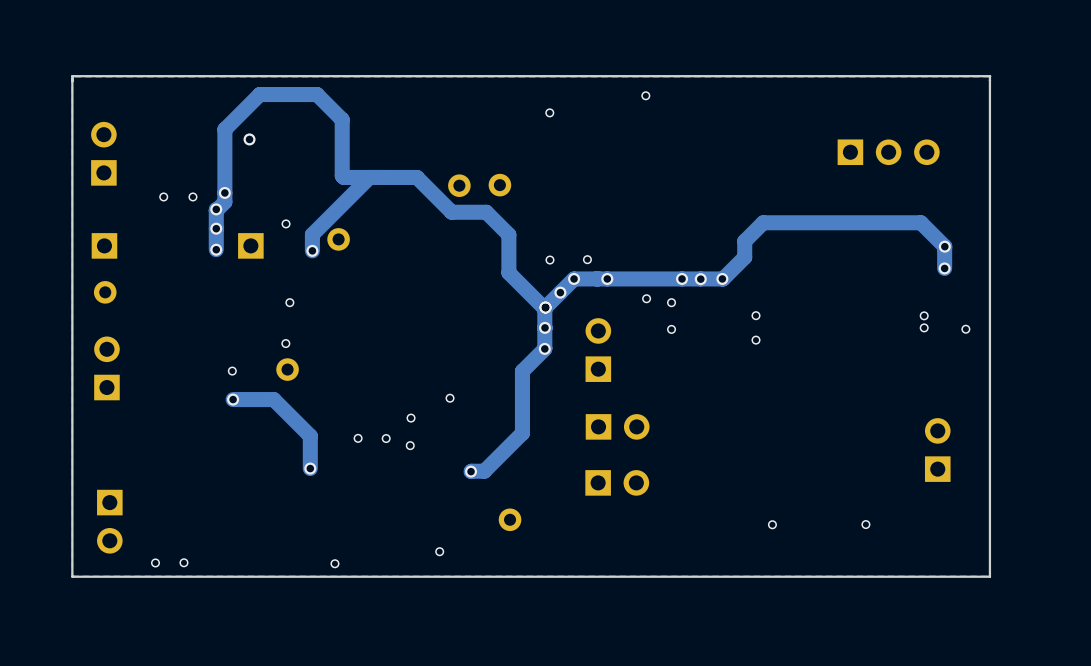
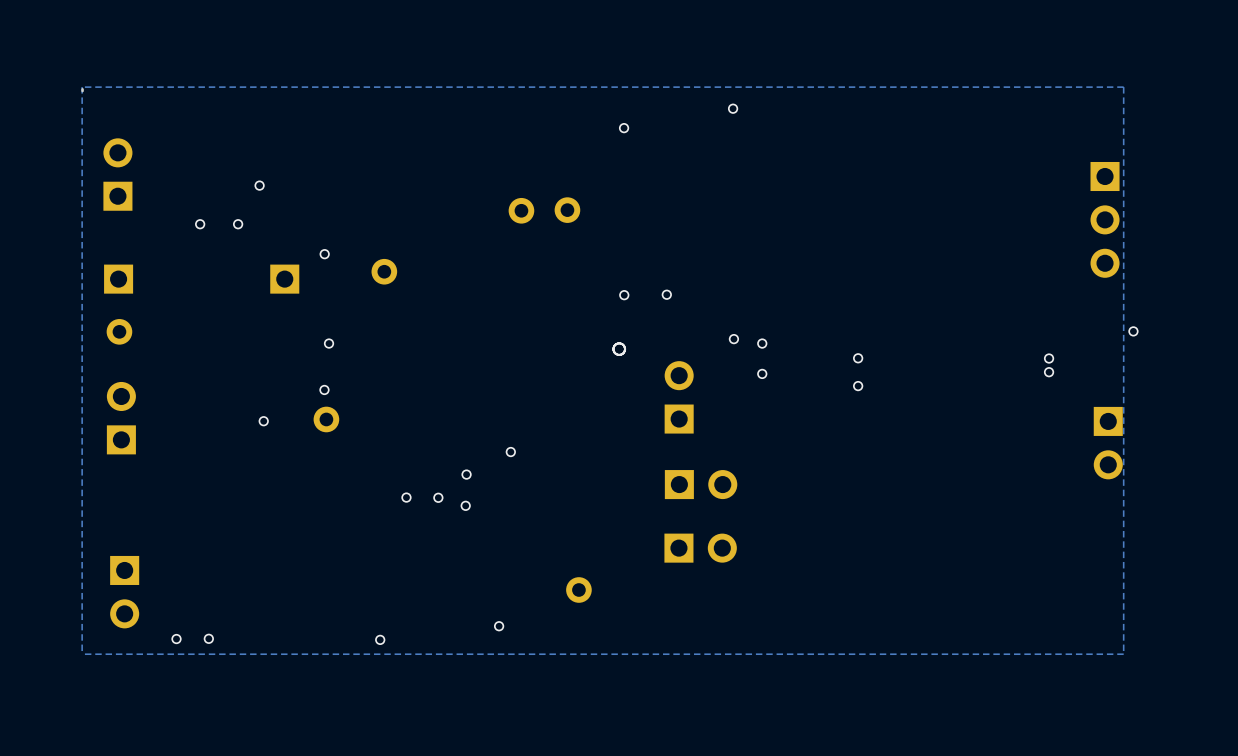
board edge: (990, 76) (72, 76) (72, 576) (989, 576) (989, 76) -> none
via: (249, 139) -> none
part rotation: 0° (888, 152) -> 90° clockwise (1105, 219)
part position: (888, 152) -> (1105, 219)
via: none -> (259, 185)
track: (369, 177) (312, 234) (312, 250) -> none
via: (224, 192) -> none
via: (163, 196) -> none
via: (192, 196) -> none
via: none -> (200, 224)
via: none -> (238, 224)
track: (216, 209) (216, 249) -> none
via: (216, 209) -> none
track: (216, 210) (224, 202) (224, 129) (259, 94) (317, 94) (342, 119) (342, 175) (343, 177) (416, 177) (451, 212) (486, 212) (508, 234) (508, 272) (545, 307) -> none
via: (216, 228) -> none
track: (944, 246) (944, 268) -> none
via: (944, 246) -> none
track: (944, 248) (944, 246) (920, 222) (763, 222) (744, 241) (744, 257) (723, 278) (574, 278) (544, 308) (544, 348) (522, 371) (522, 433) (484, 471) (471, 471) -> none
via: (216, 249) -> none
via: (312, 250) -> none
via: (944, 268) -> none
via: (574, 278) -> none
via: (607, 278) -> none
via: (682, 278) -> none
via: (722, 278) -> none
via: (700, 279) -> none
via: (560, 292) -> none
via: (545, 327) -> none
via position: (965, 329) -> (1133, 331)
via: (544, 348) -> none
track: (233, 399) (273, 399) (310, 436) (310, 468) -> none
via: (233, 399) -> none
part rotation: 0° (937, 450) -> 180° (1108, 443)
part position: (937, 450) -> (1108, 443)
via: (310, 468) -> none
via: (471, 471) -> none
via: (772, 524) -> none
via: (865, 524) -> none

